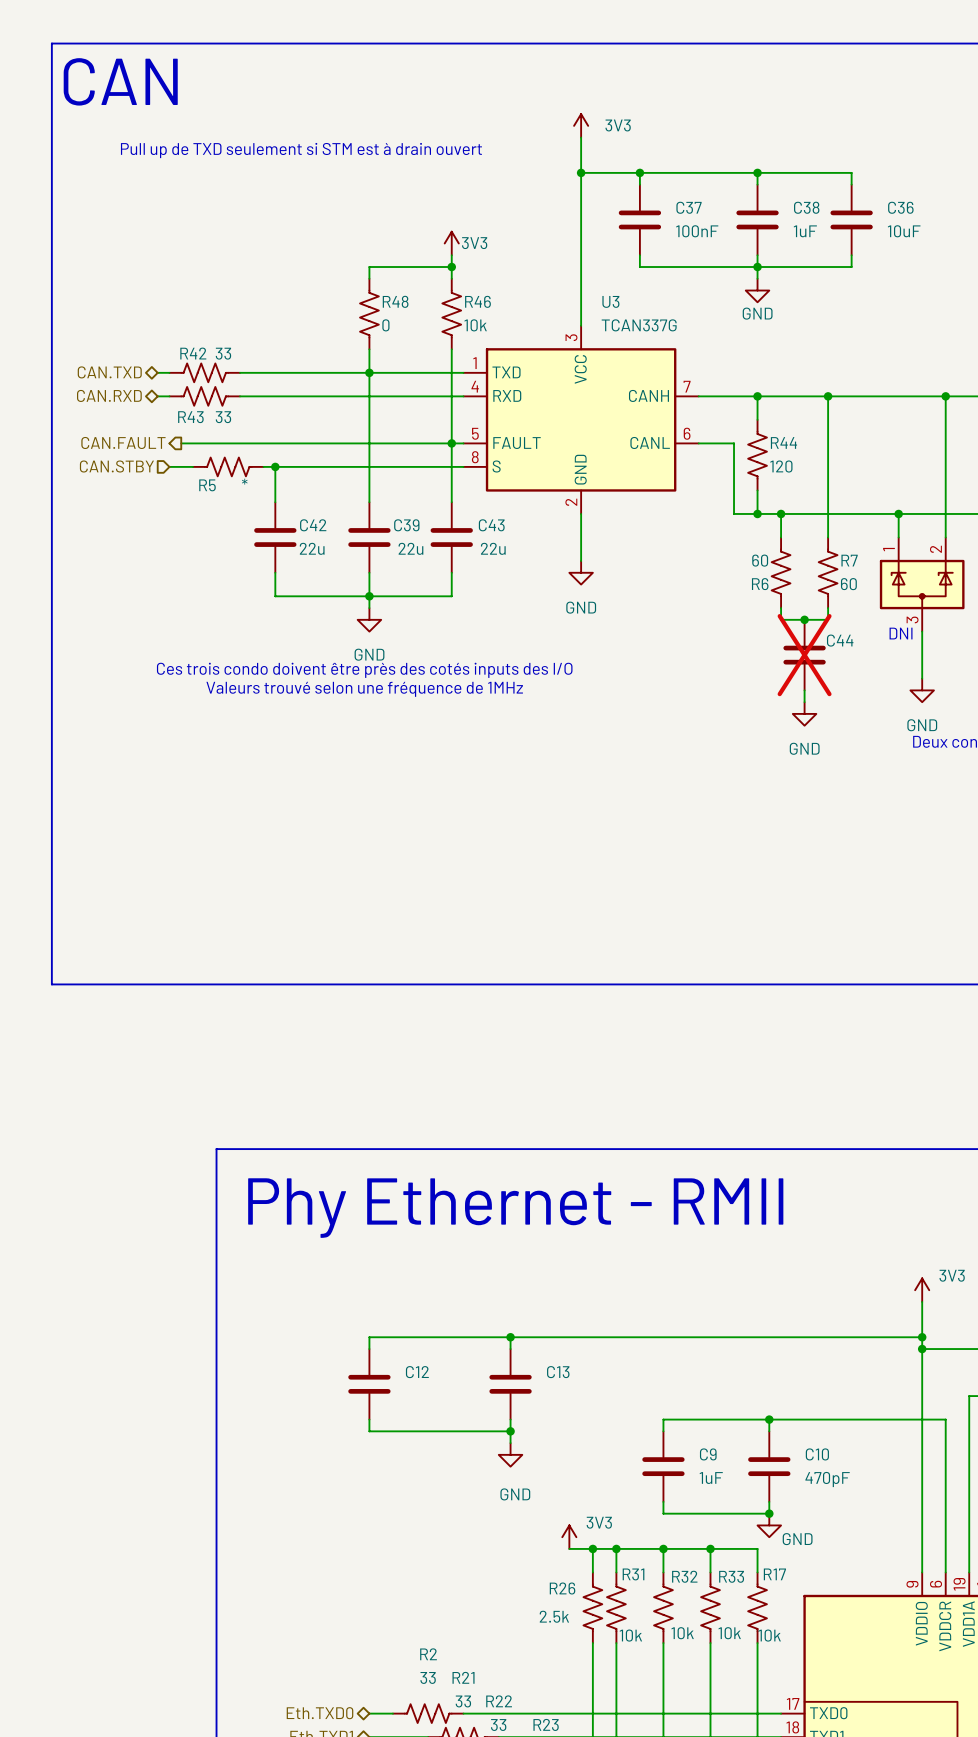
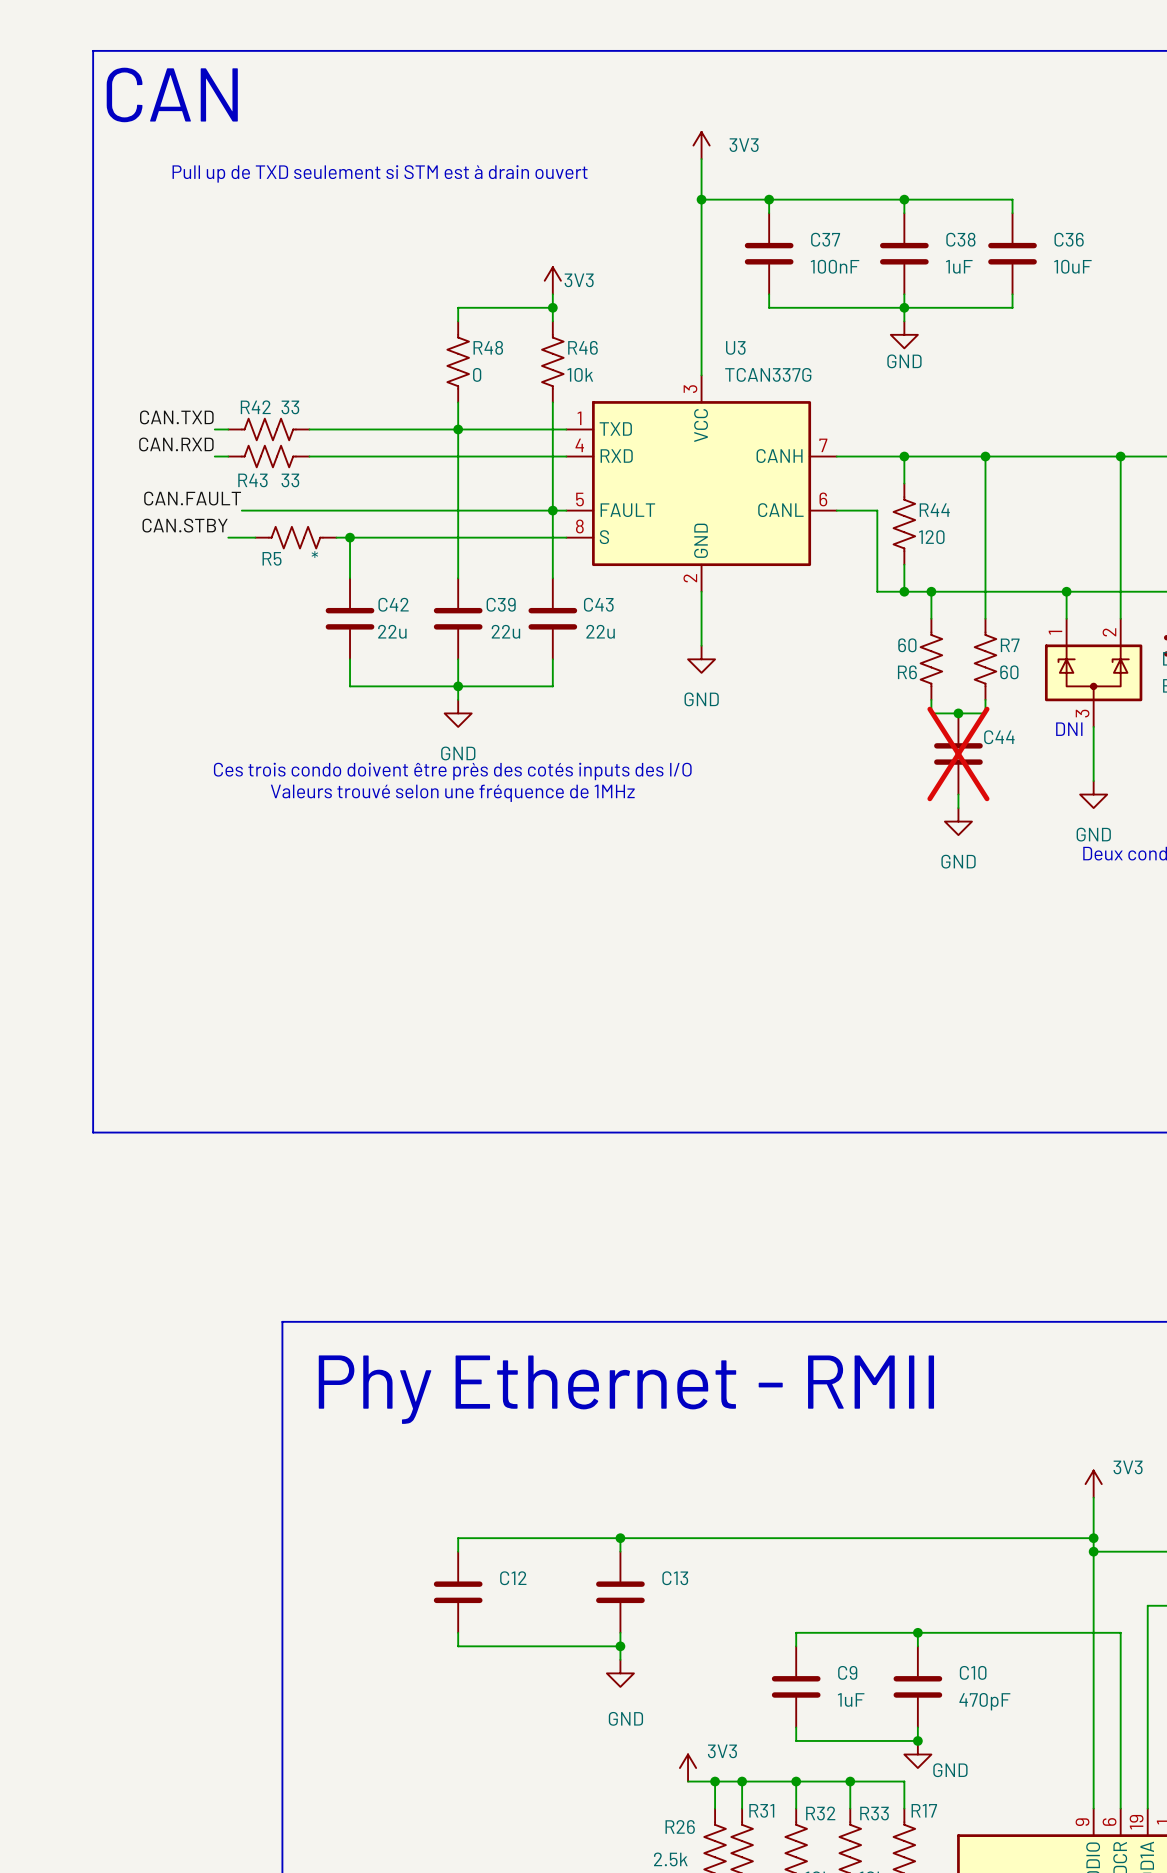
label: none -> CAN.TXD (176, 417)
hierarchical label: CAN.TXD (109, 372) -> none
label: none -> CAN.RXD (176, 444)
hierarchical label: CAN.RXD (109, 395) -> none
label: none -> CAN.FAULT (192, 498)
hierarchical label: CAN.FAULT (123, 442) -> none
label: none -> CAN.STBY (185, 525)
hierarchical label: CAN.STBY (116, 466) -> none

